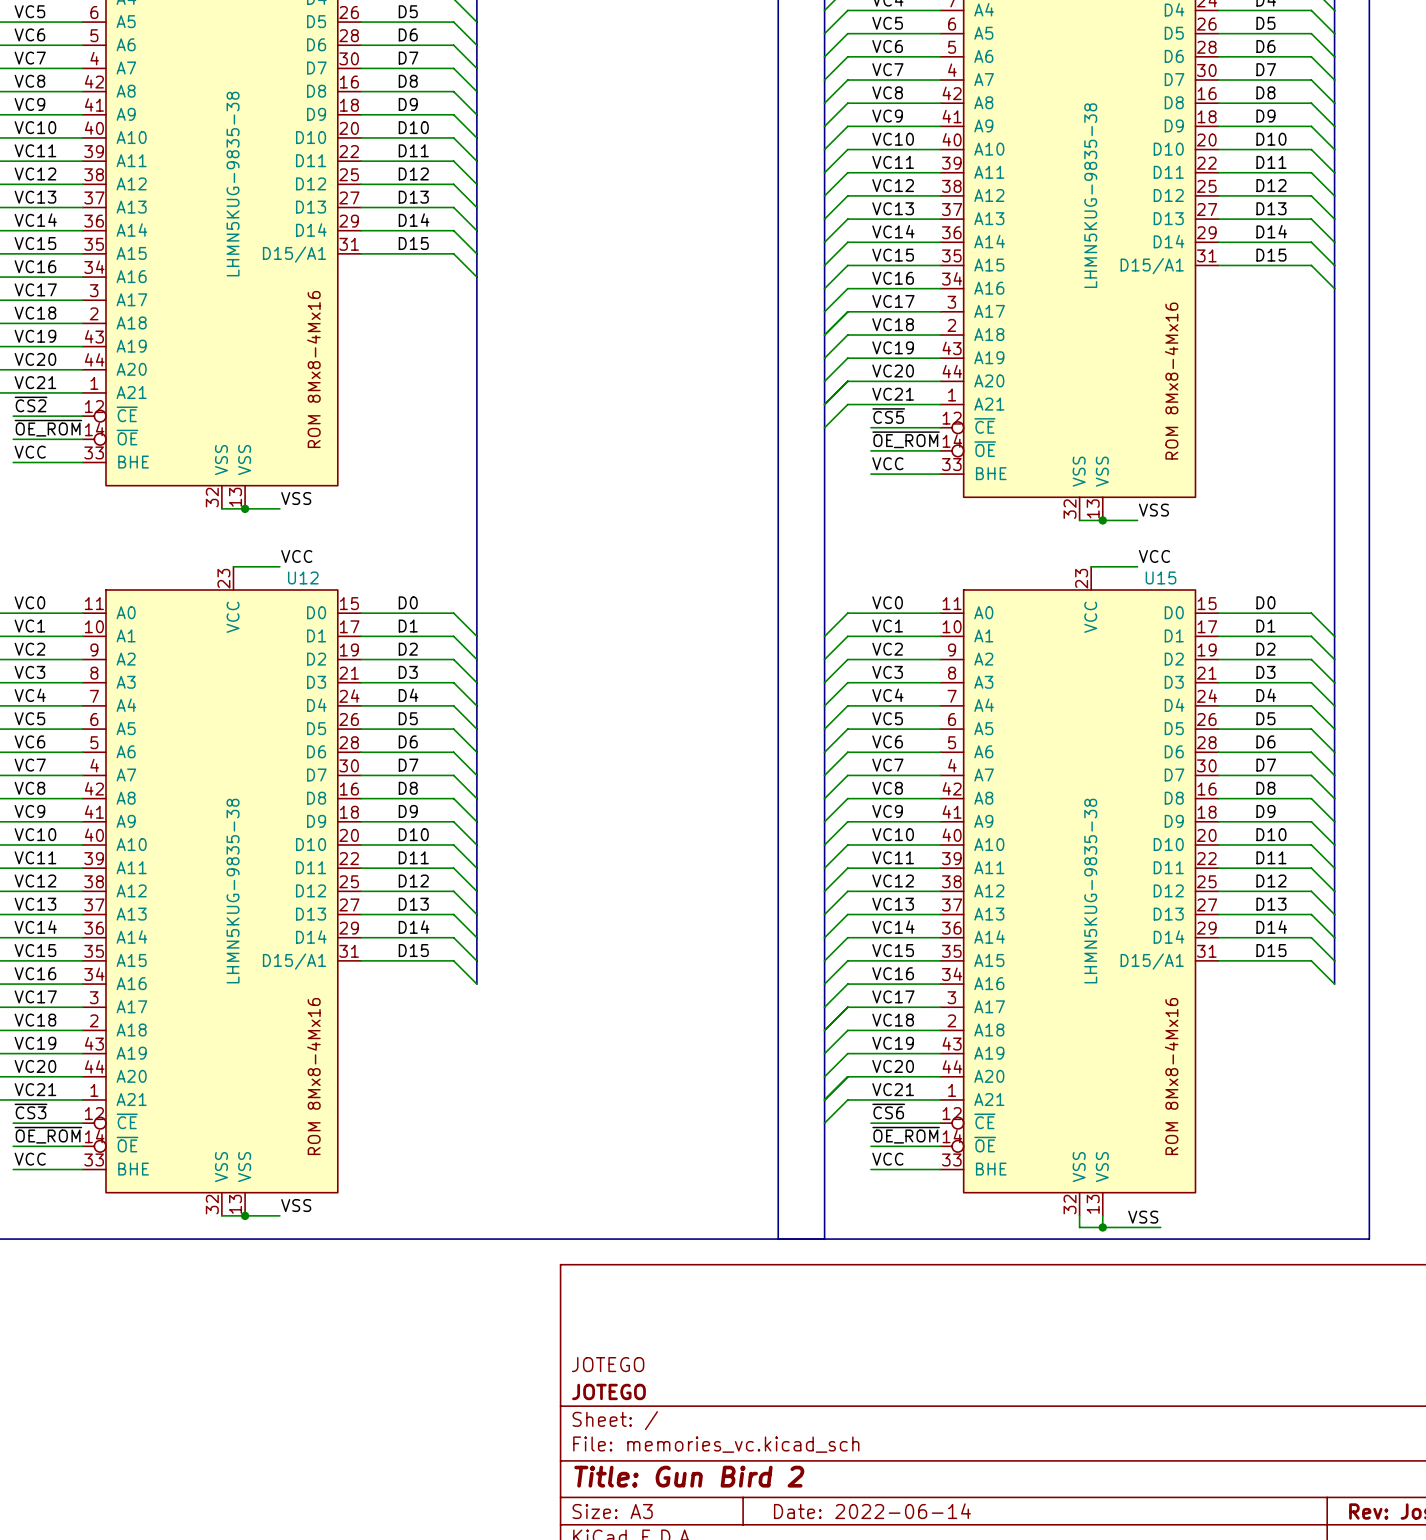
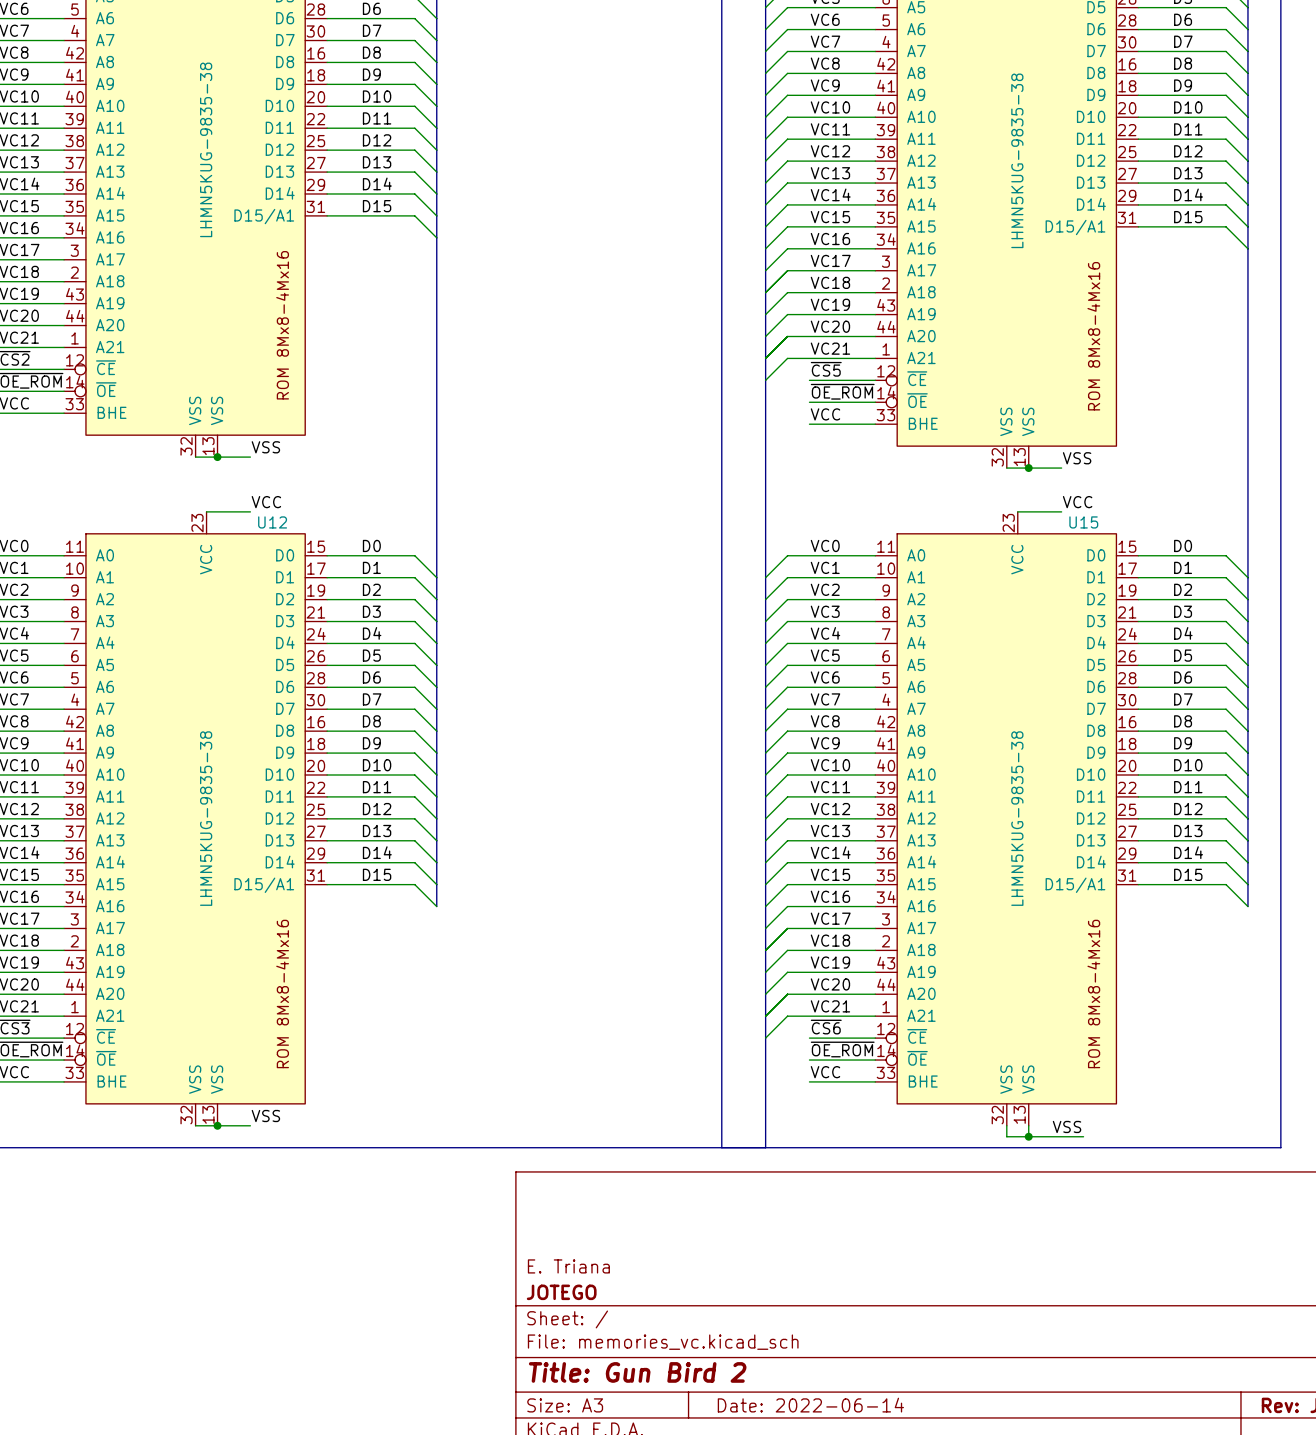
title block: JOTEGO (608, 1364) -> E. Triana (568, 1266)

